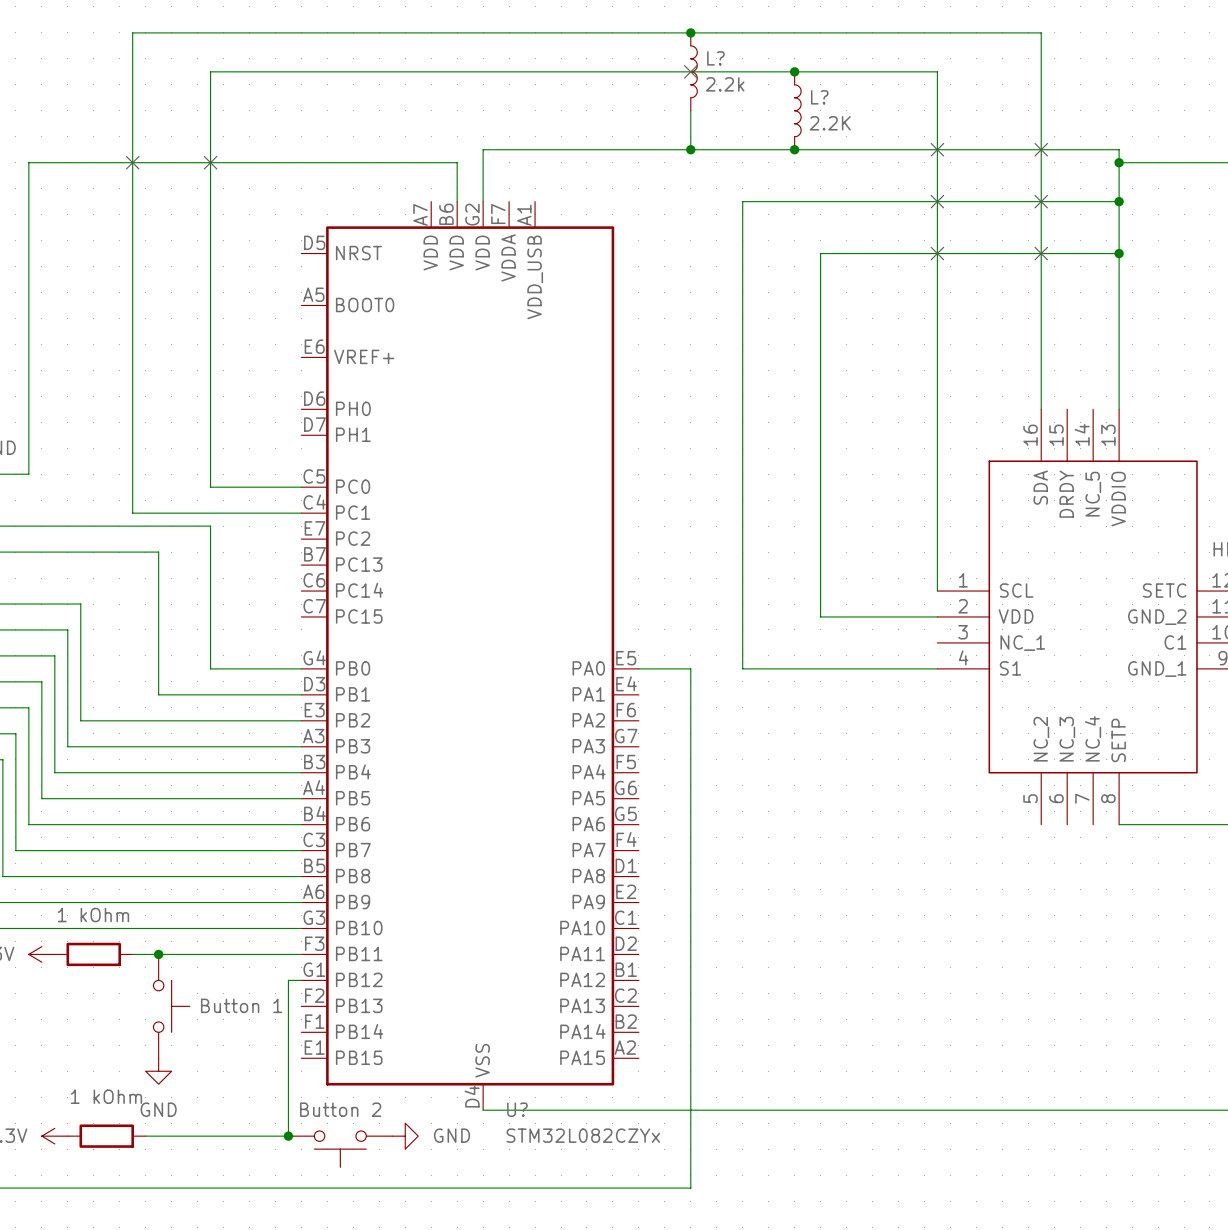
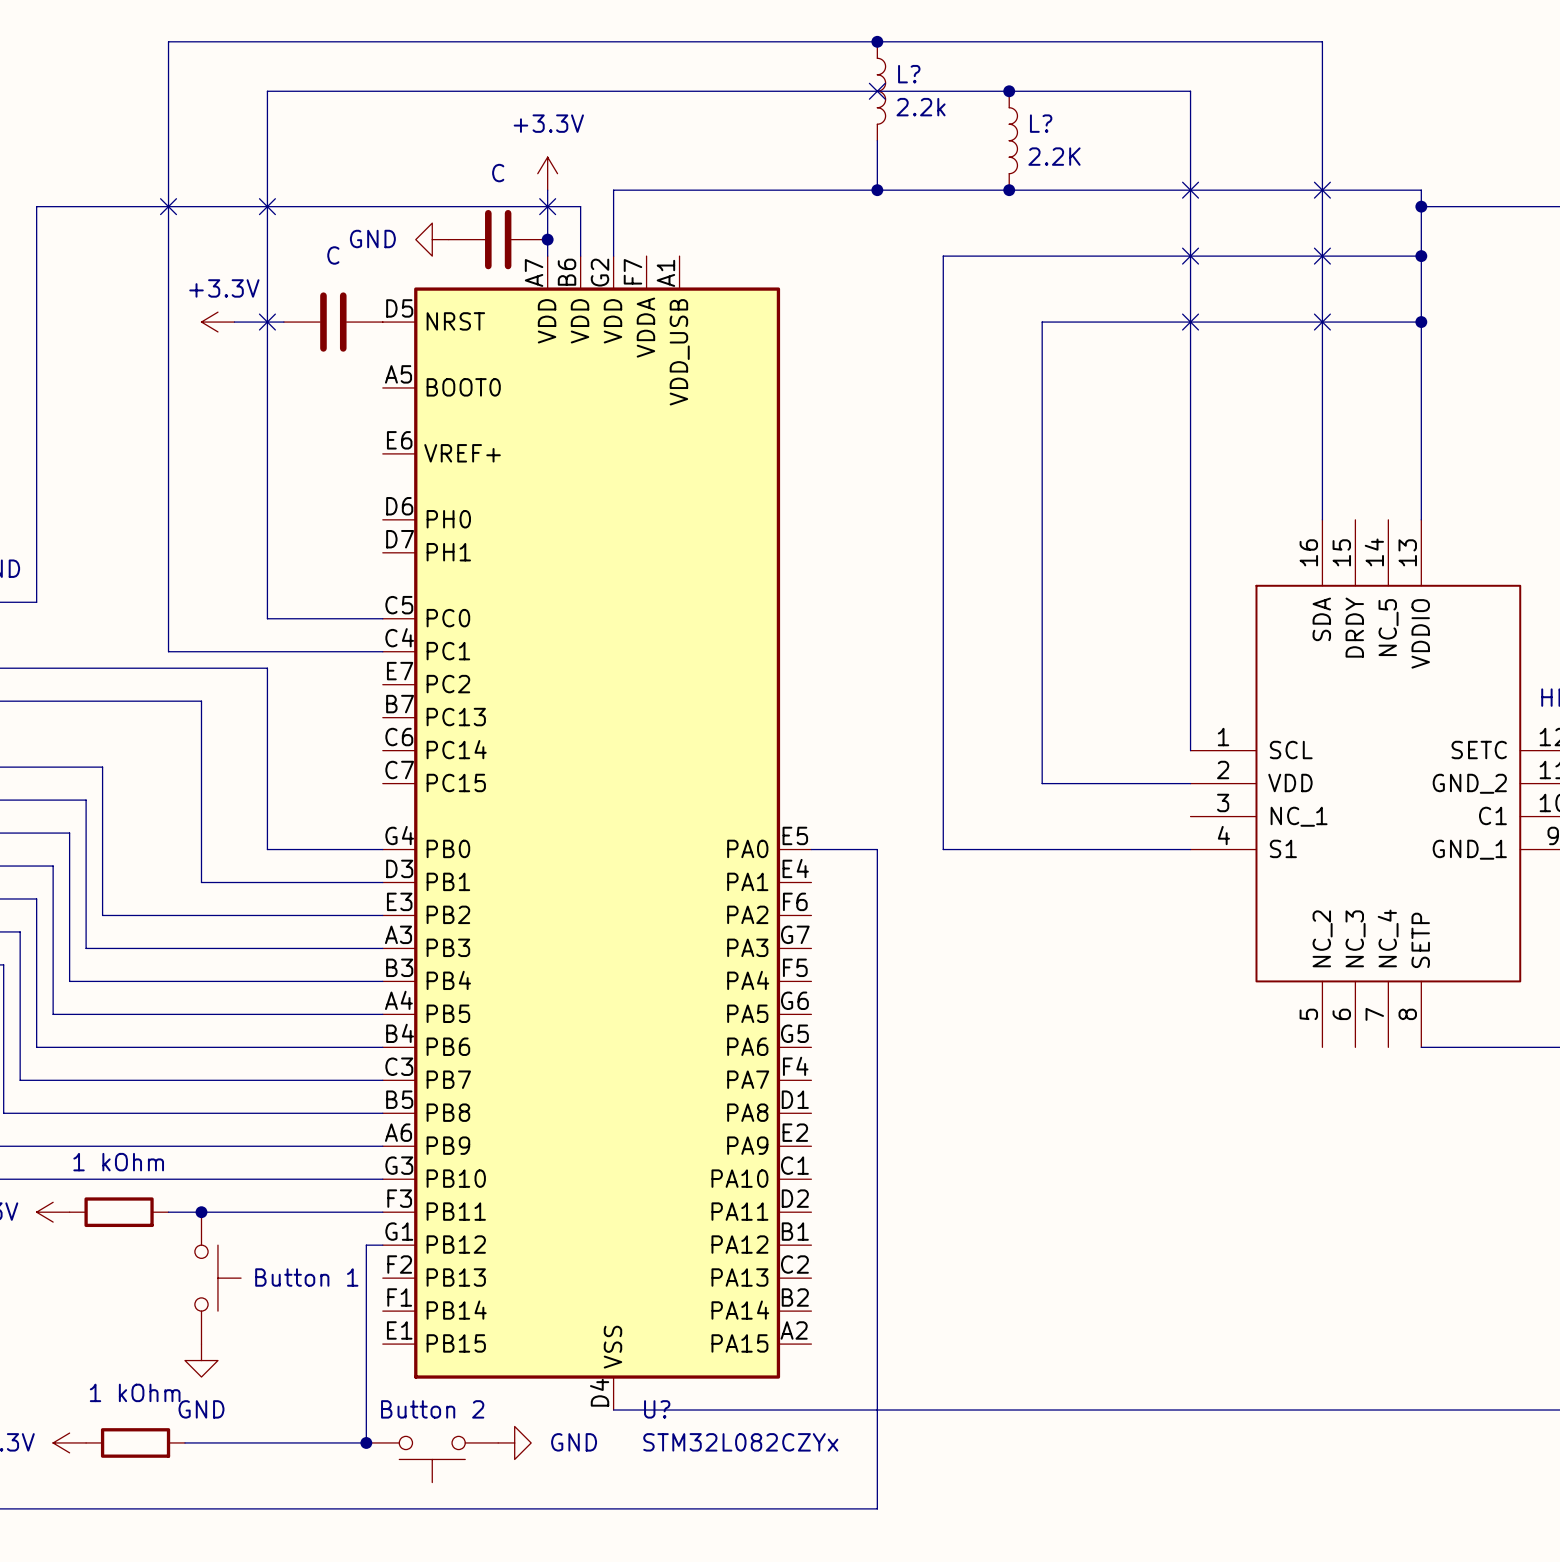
power symbol: none -> +3.3V (547, 173)
wire: none -> (547, 190) (547, 256)
no-connect mark: none -> (547, 206)
power symbol: none -> GND (432, 239)
part: none -> C (498, 239)
junction: none -> (547, 239)
power symbol: none -> +3.3V (217, 322)
wire: none -> (234, 322) (283, 322)
no-connect mark: none -> (267, 322)
part: none -> C (333, 322)

